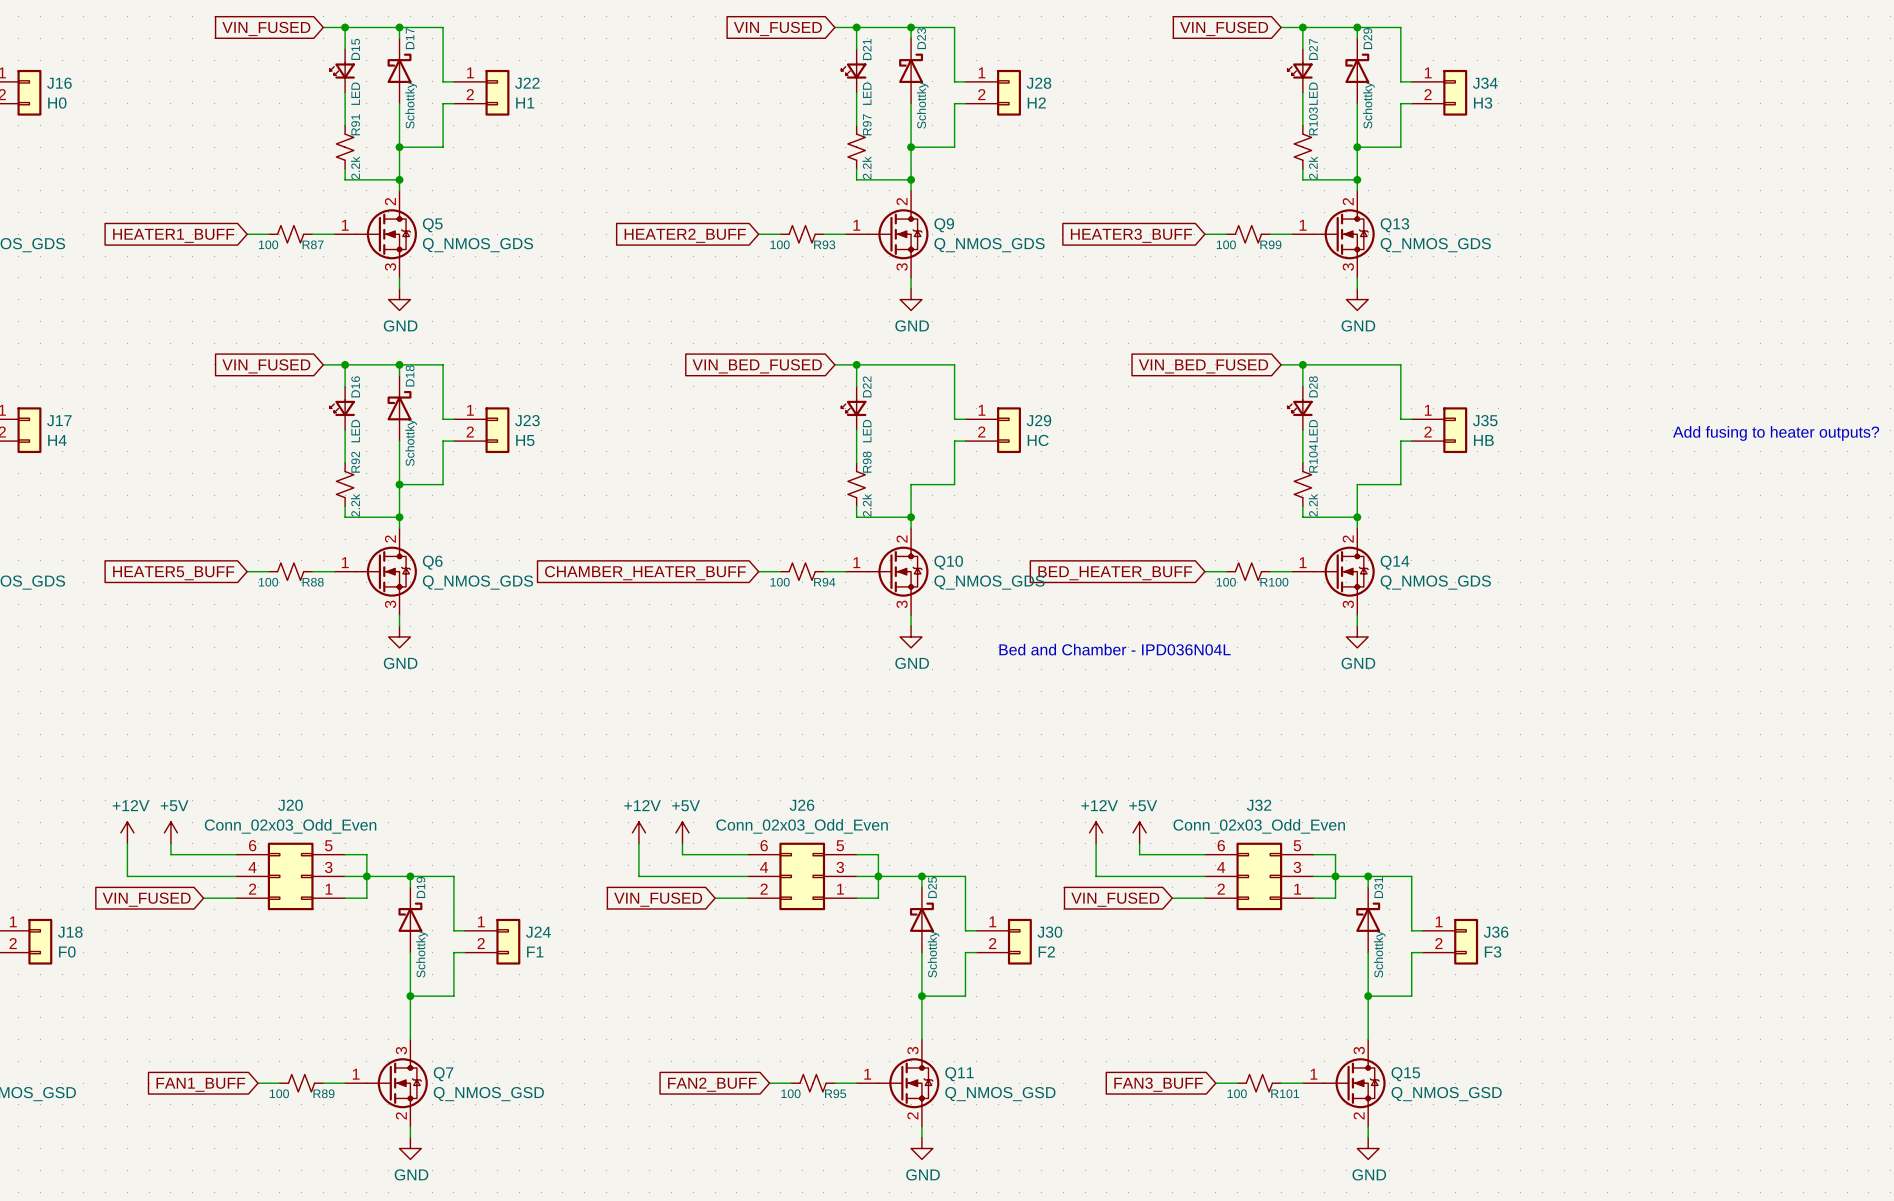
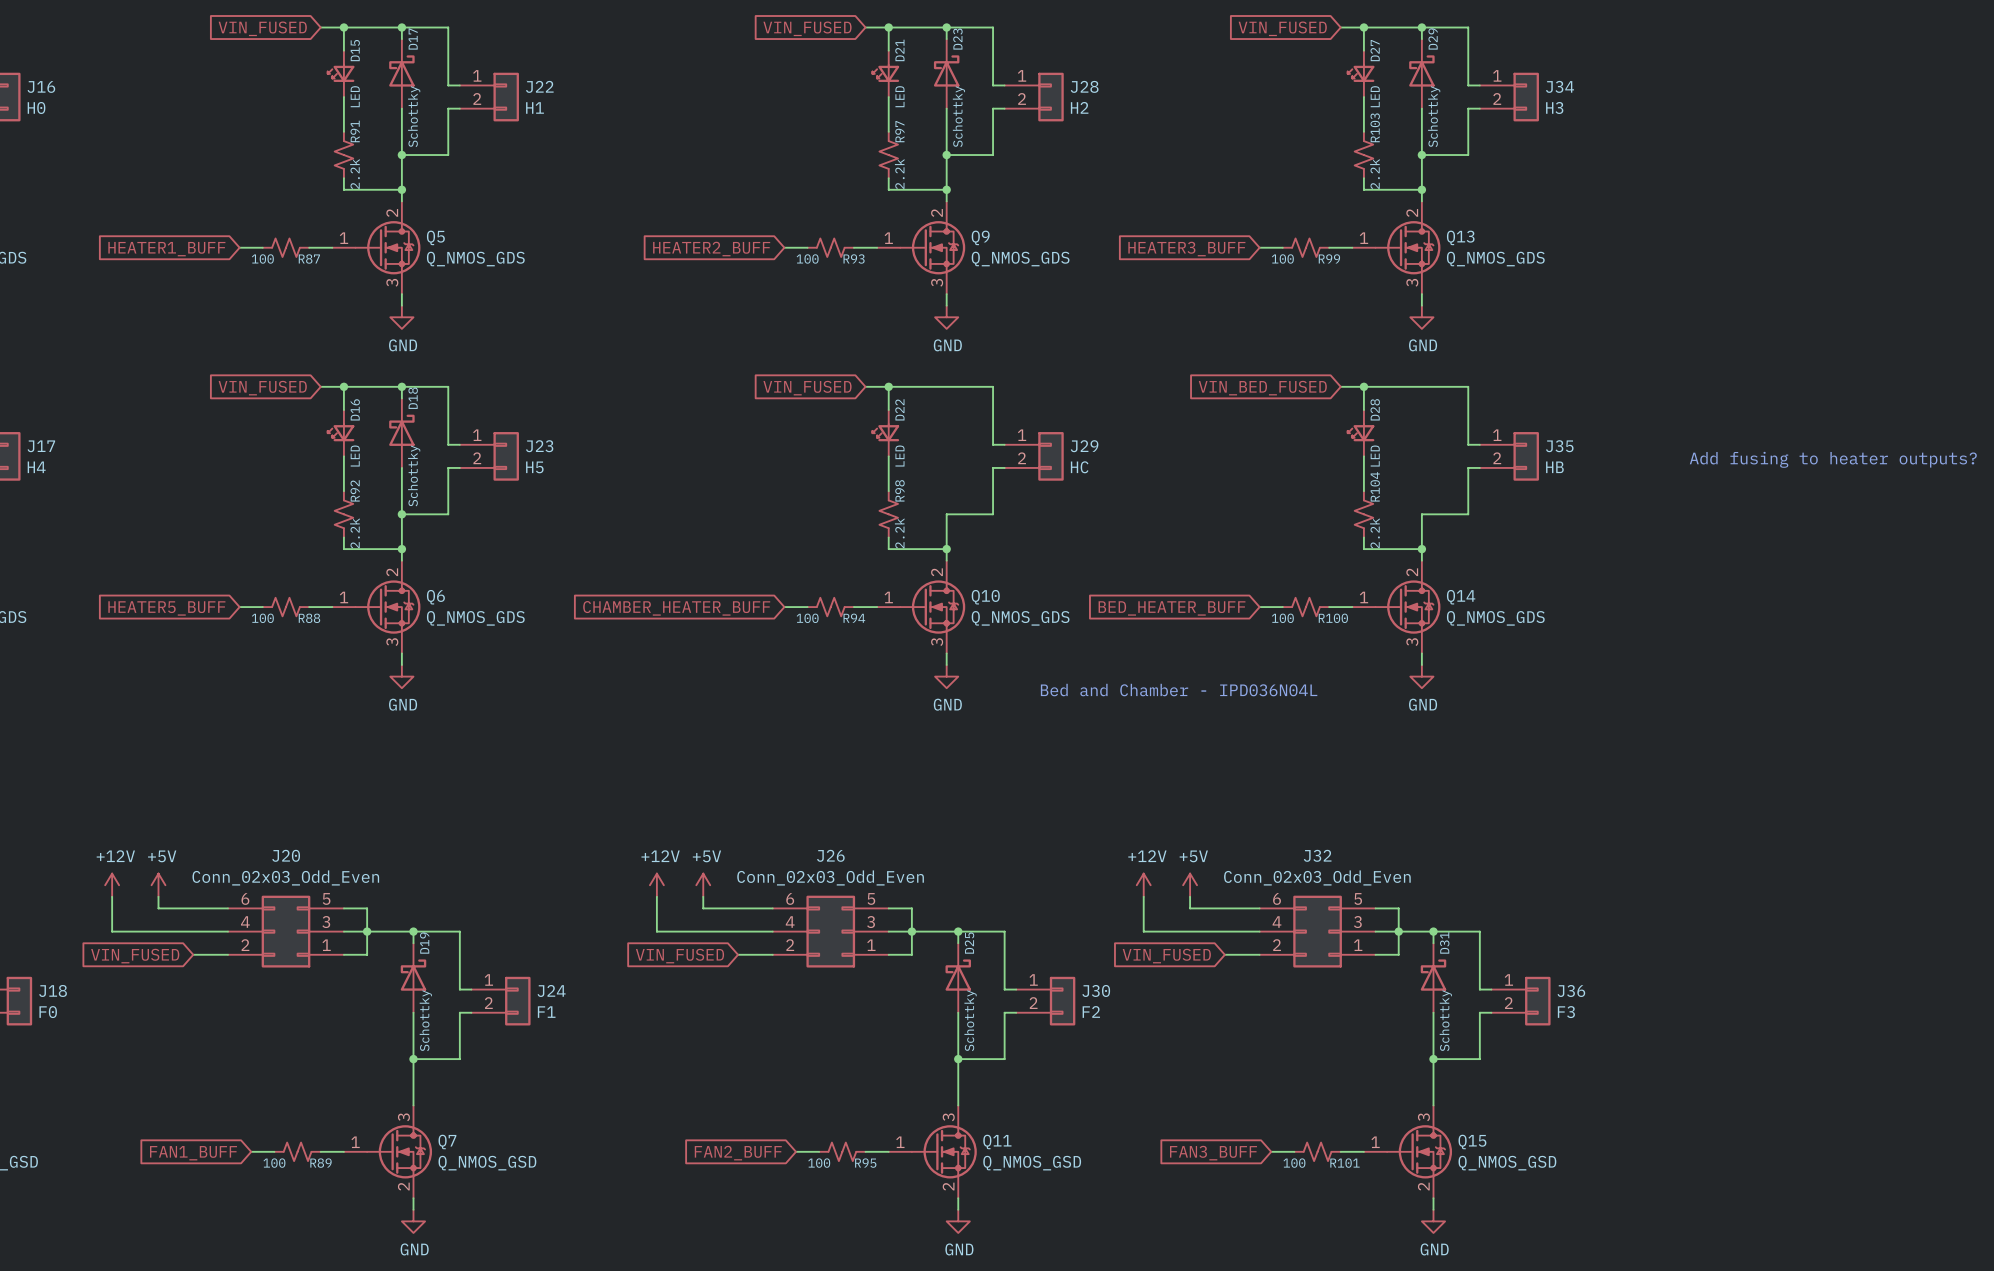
global label: VIN_BED_FUSED (757, 366) -> VIN_FUSED (807, 388)

